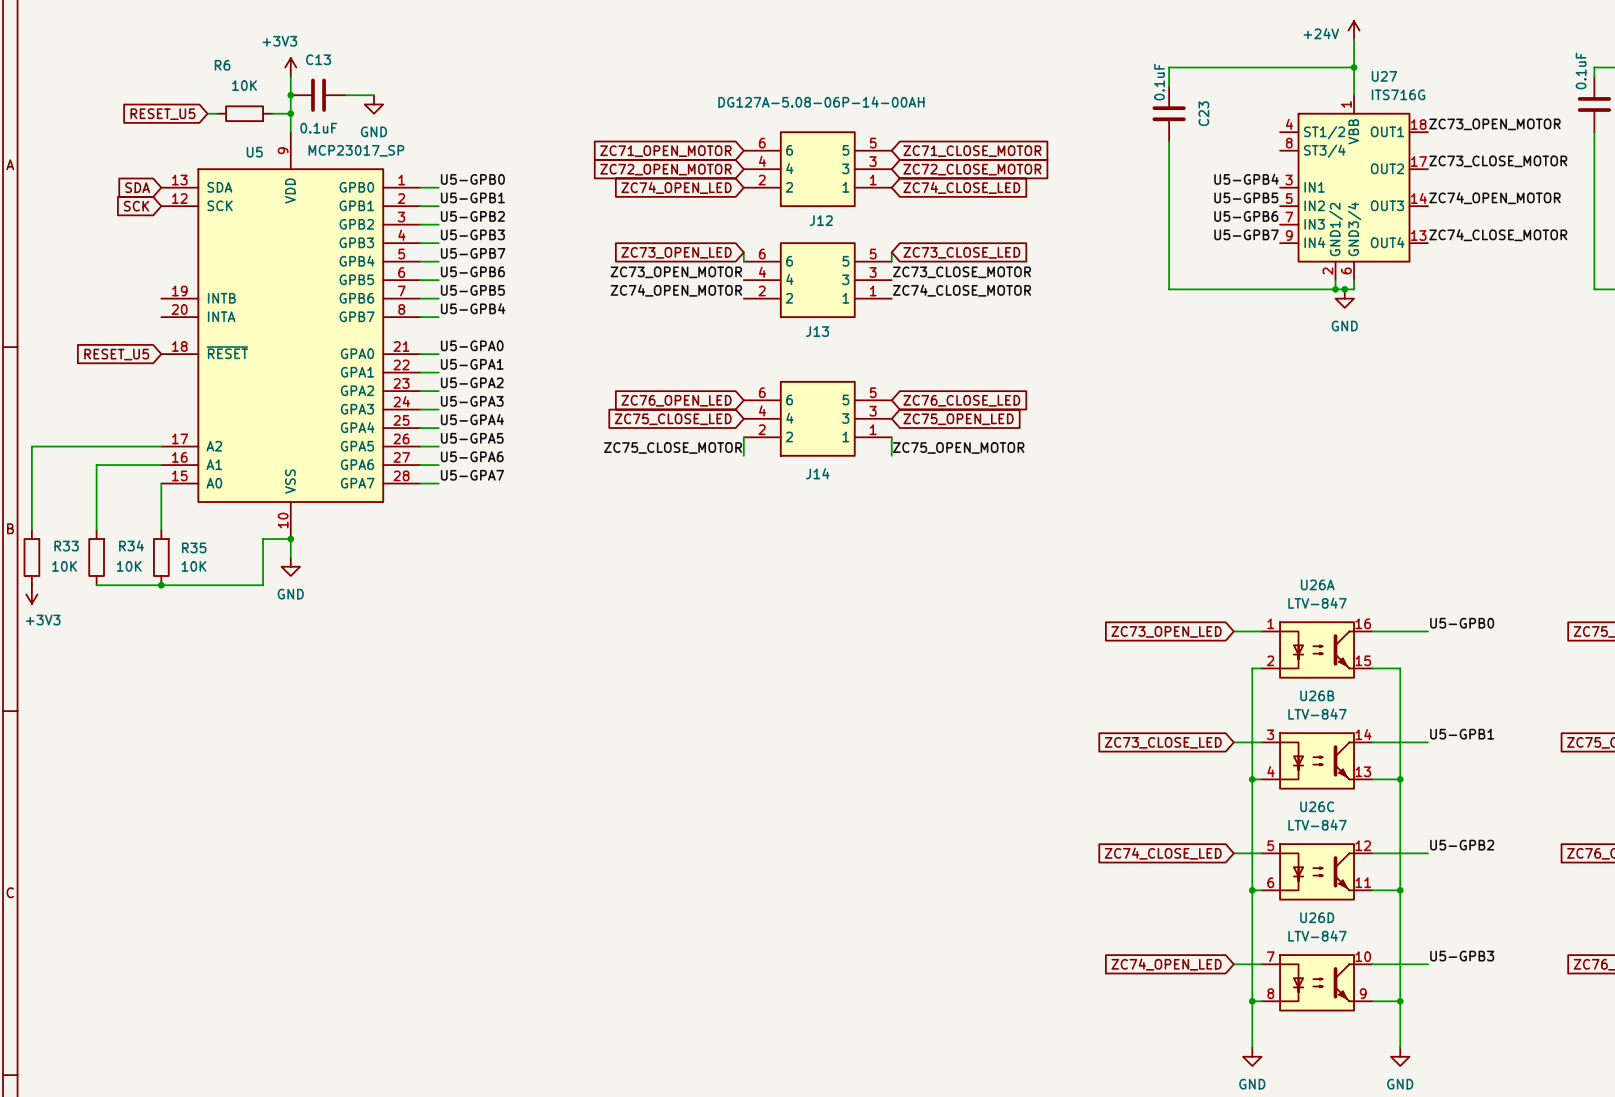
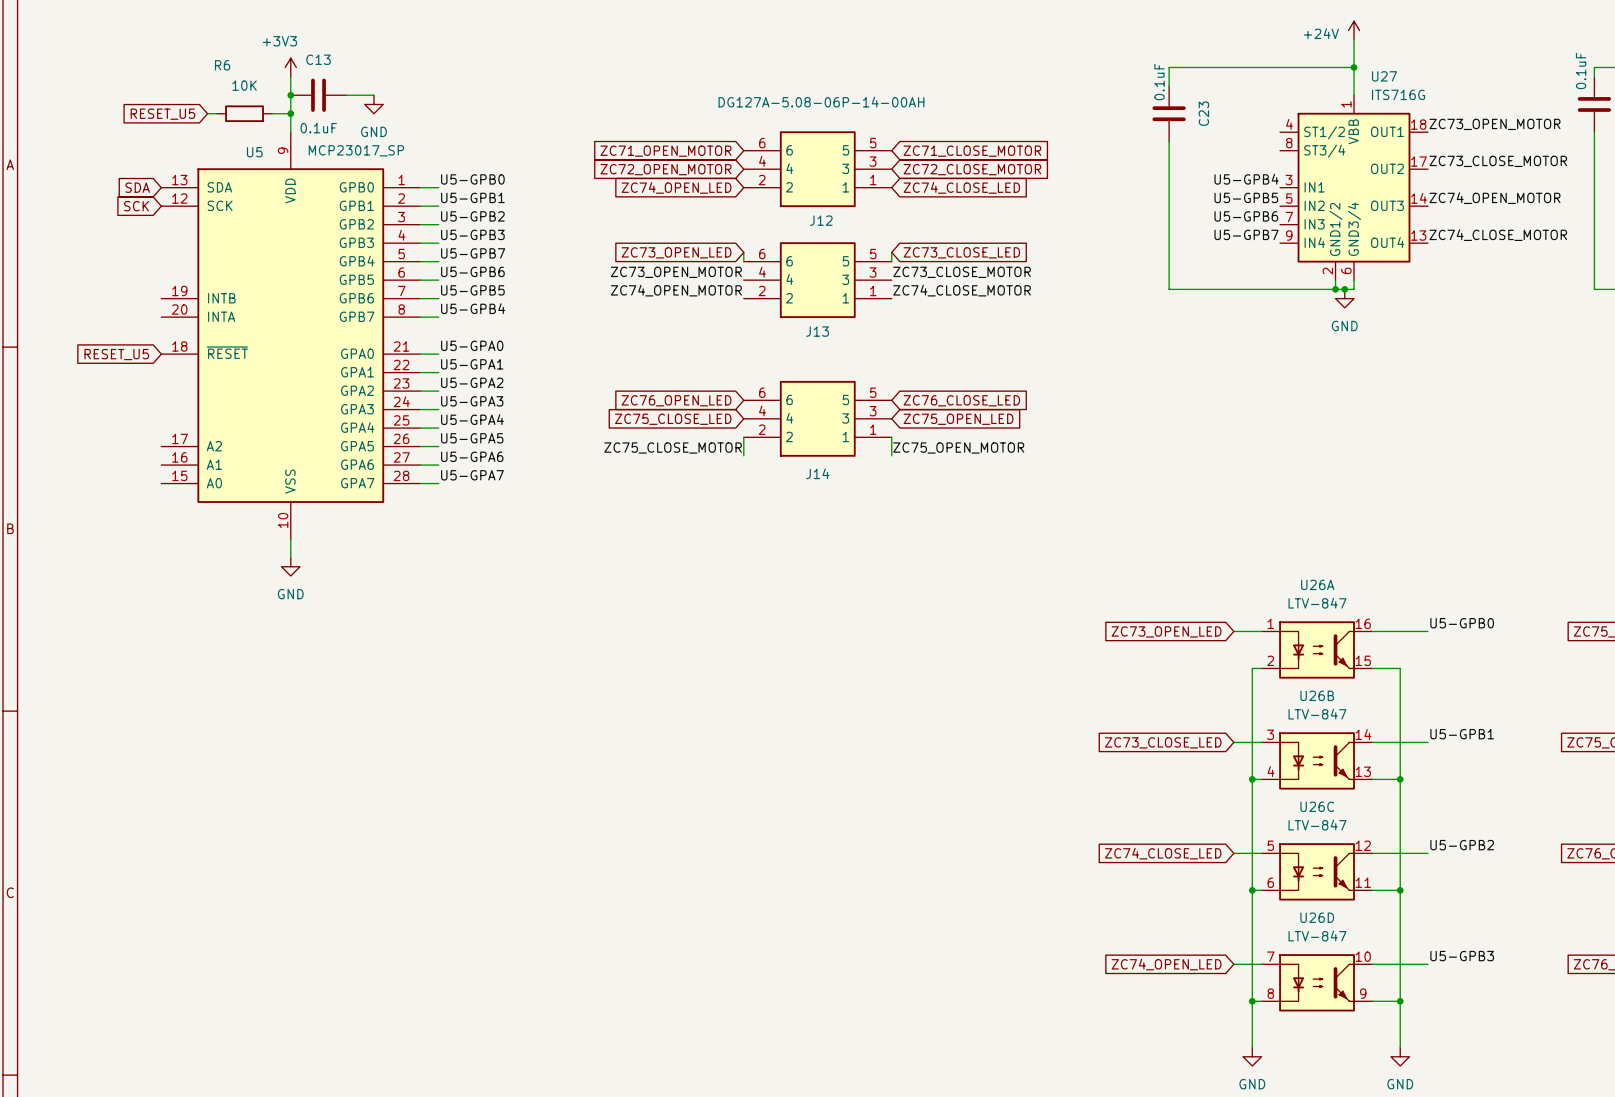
wire: (161, 446) (31, 446) (31, 529) -> none
wire: (161, 465) (96, 465) (96, 529) -> none
wire: (161, 483) (161, 529) -> none
wire: (290, 539) (263, 539) (263, 585) (96, 585) -> none
junction: (290, 539) -> none
R33: 10K (31, 557) -> none
R34: 10K (96, 557) -> none
R35: 10K (161, 557) -> none
junction: (161, 585) -> none
power symbol: +3V3 (31, 594) -> none

